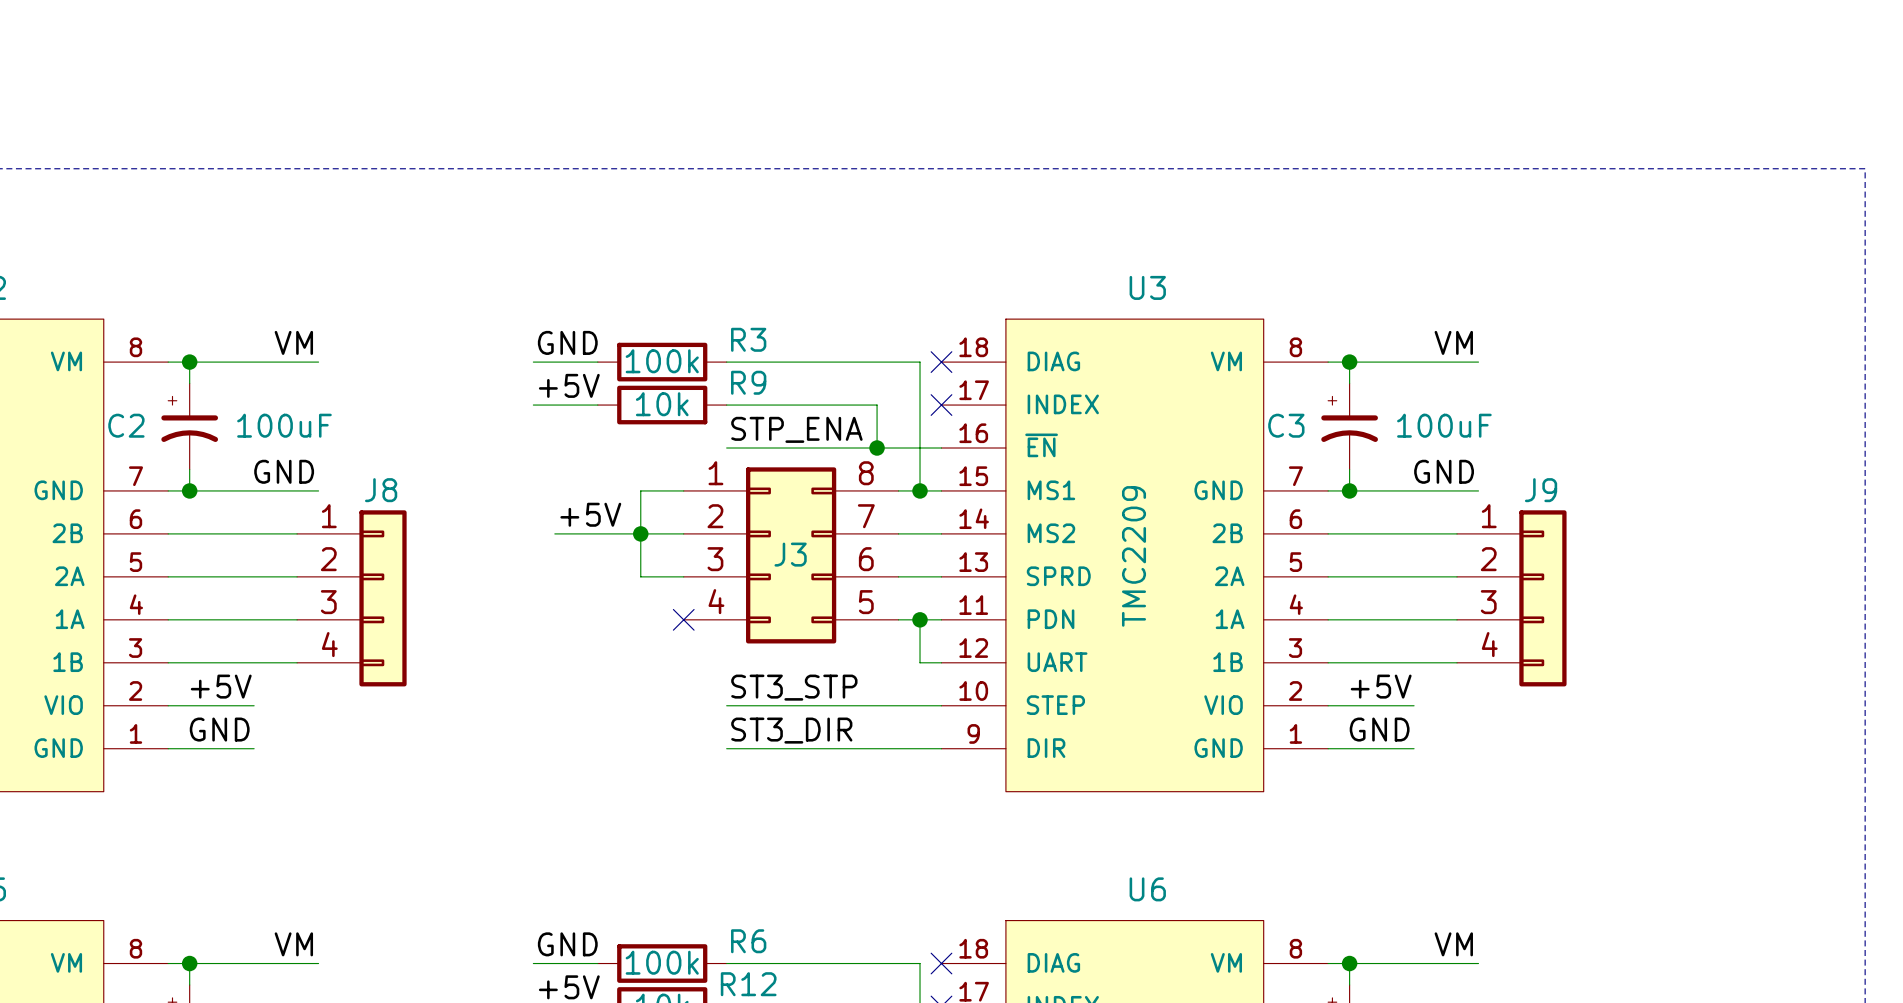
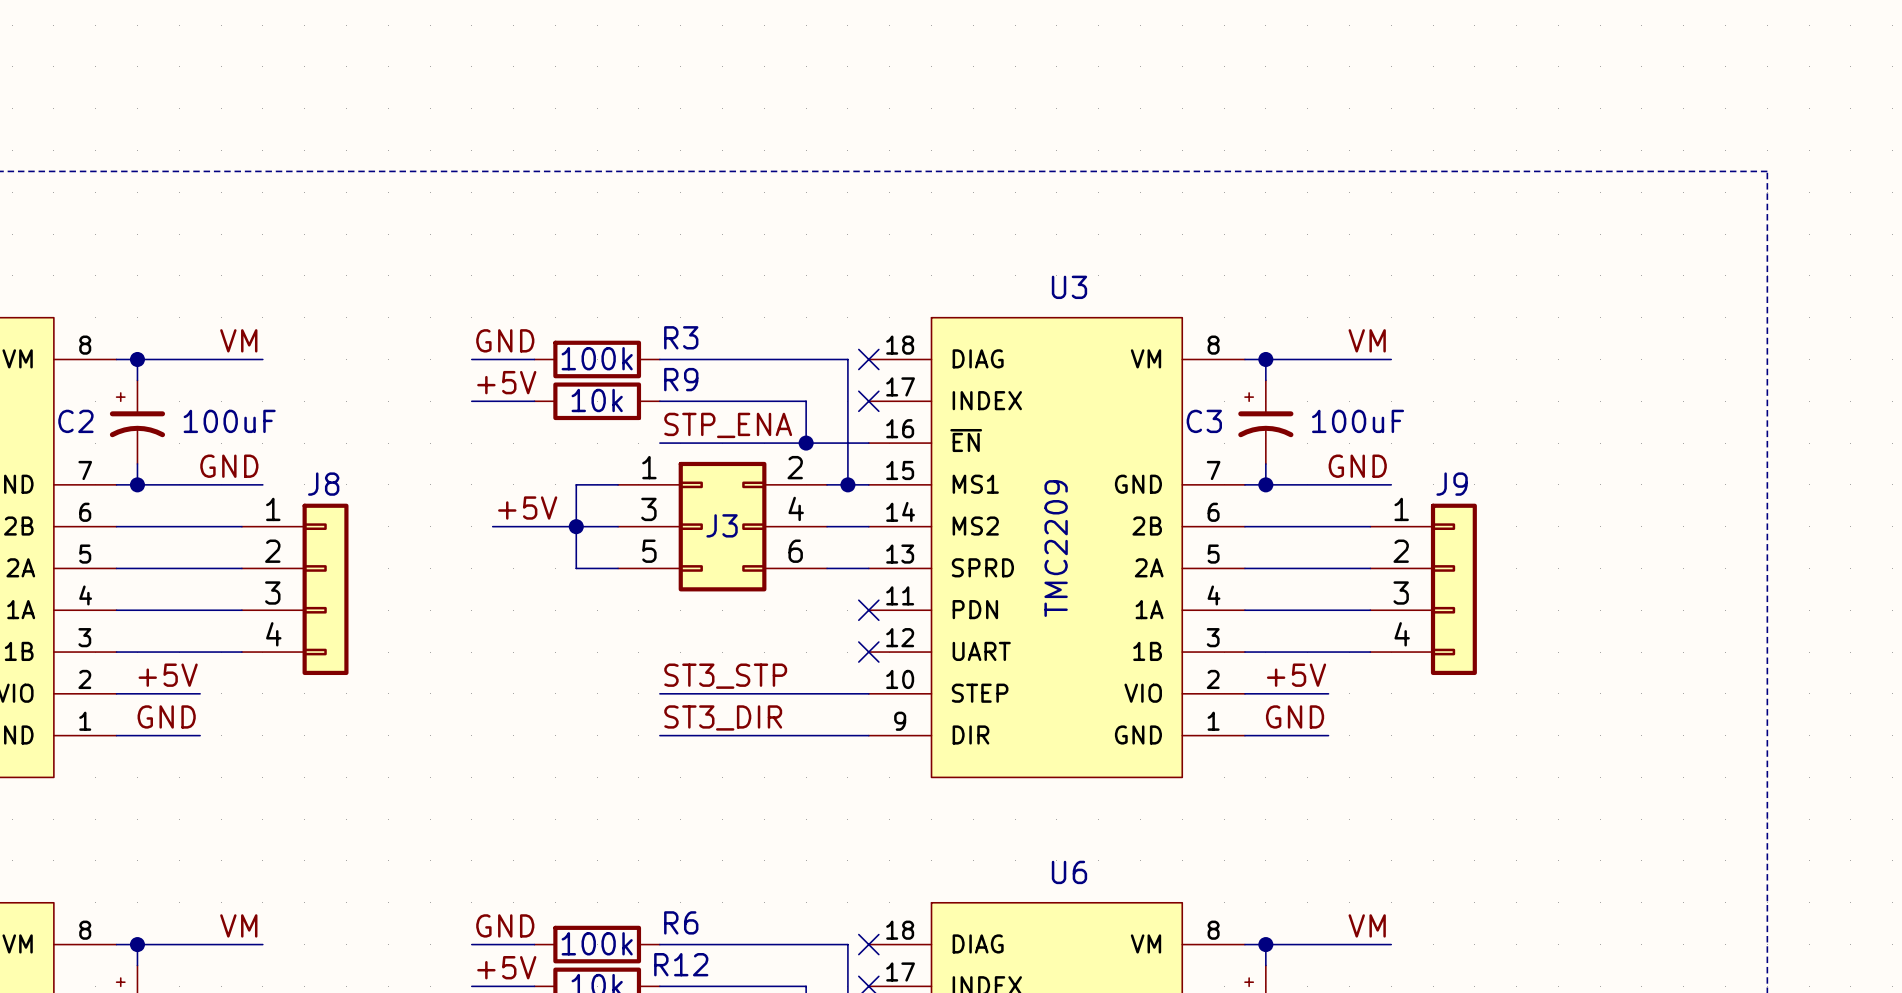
J3 symbol: [683, 467, 899, 644] -> [618, 461, 828, 592]
no-connect mark: (683, 619) -> none
wire: (898, 619) (941, 619) -> none
wire: (920, 619) (920, 662) (941, 662) -> none
junction: (920, 619) -> none
no-connect mark: none -> (868, 610)
no-connect mark: none -> (868, 652)

